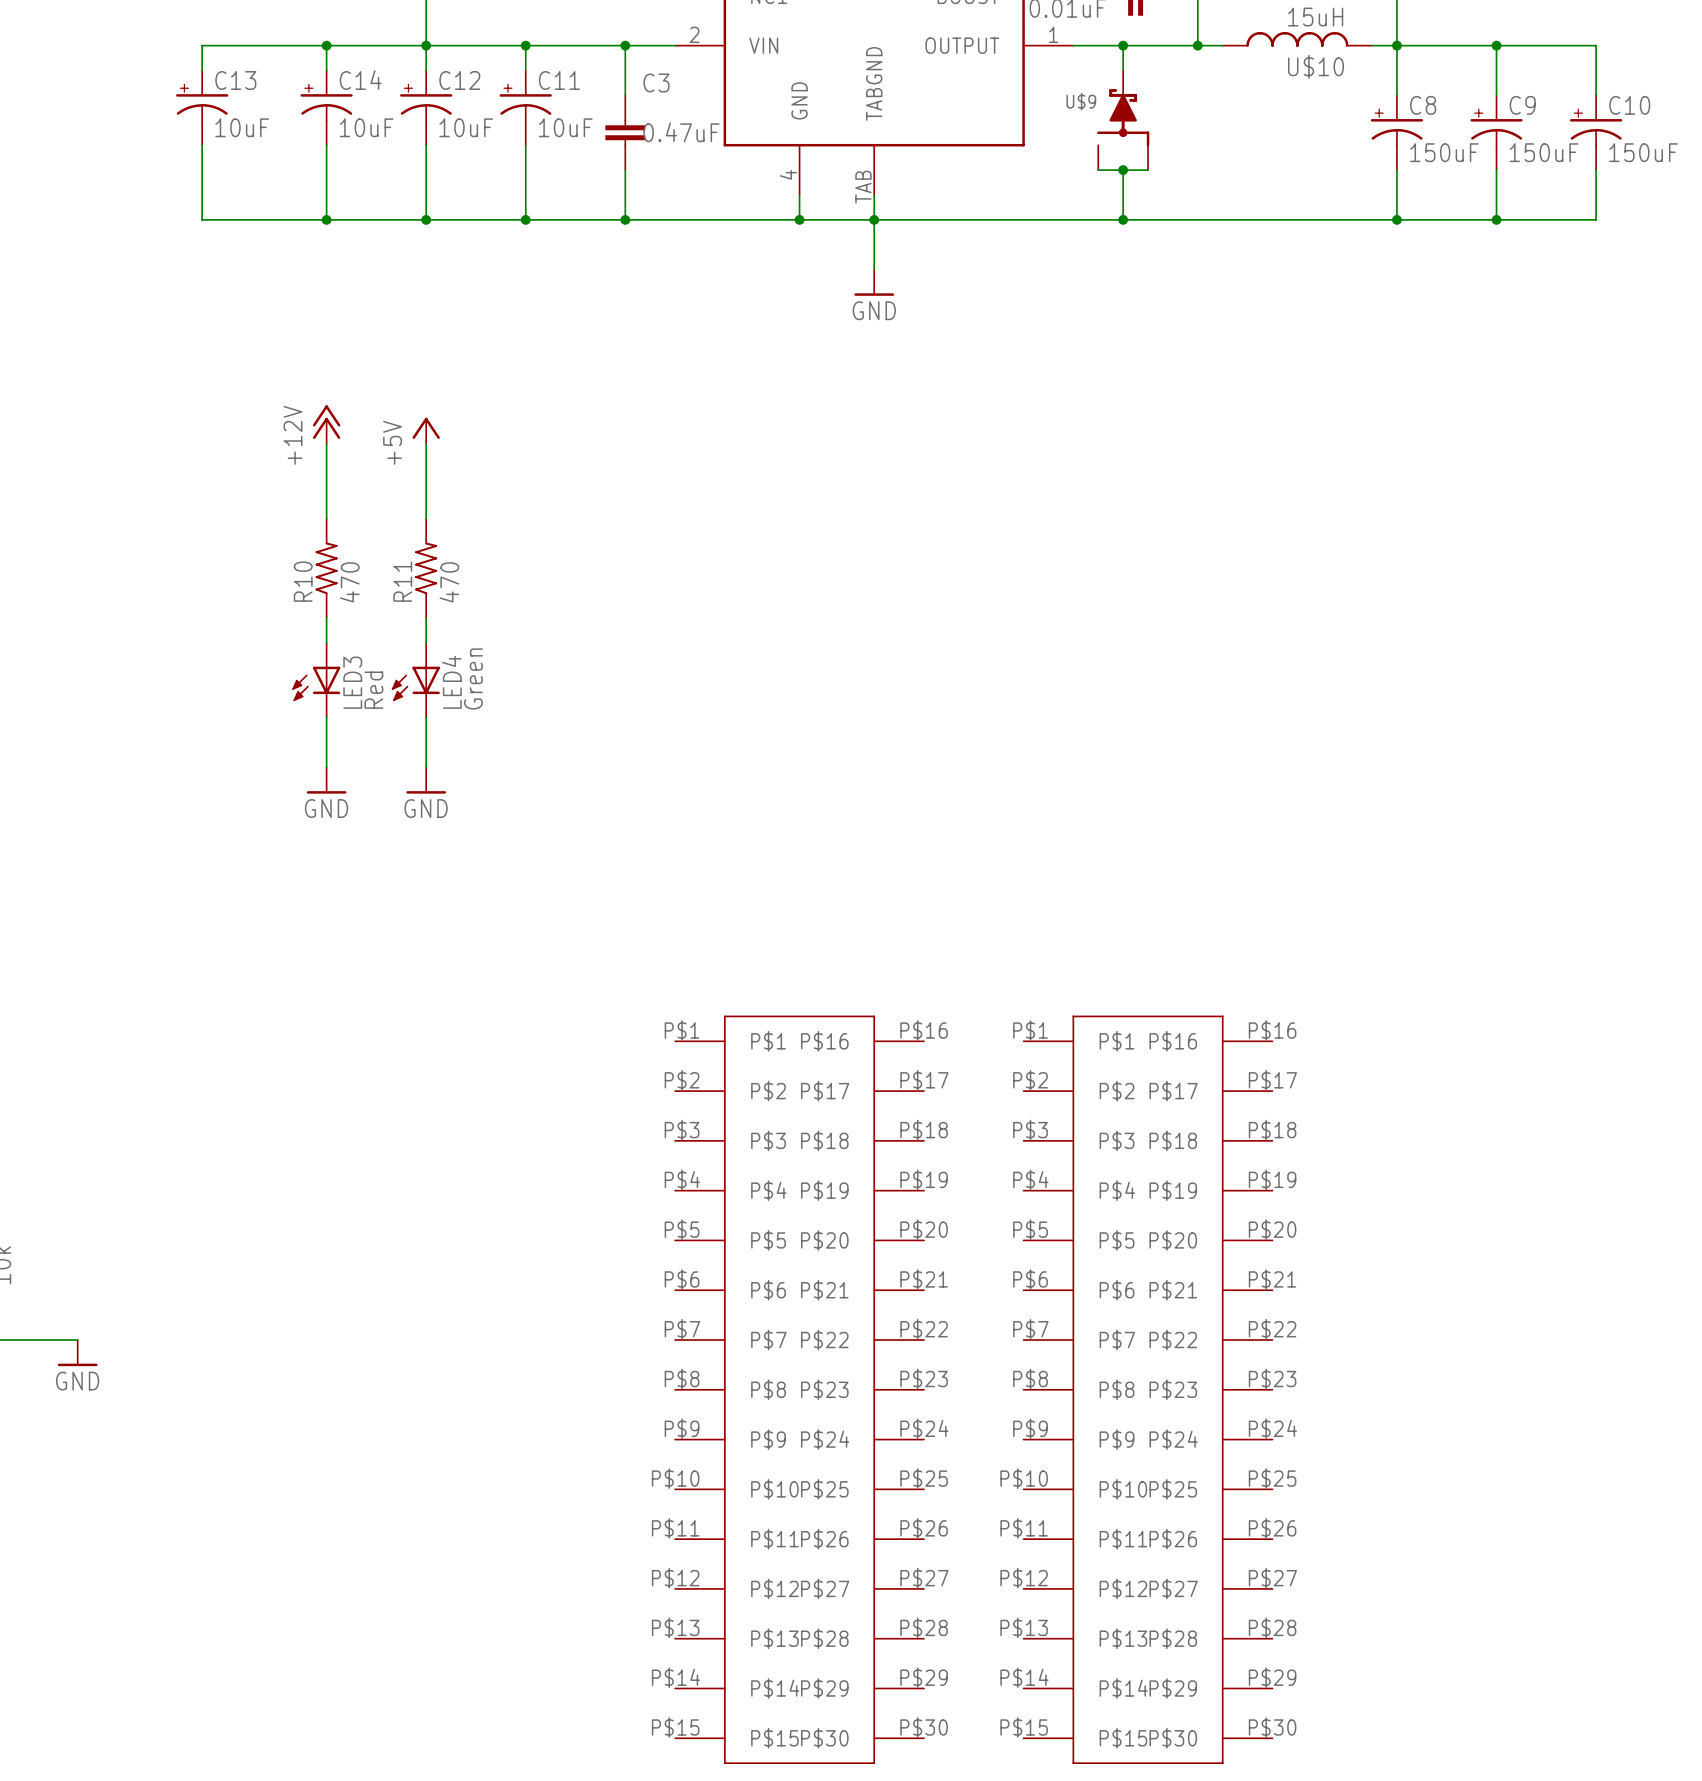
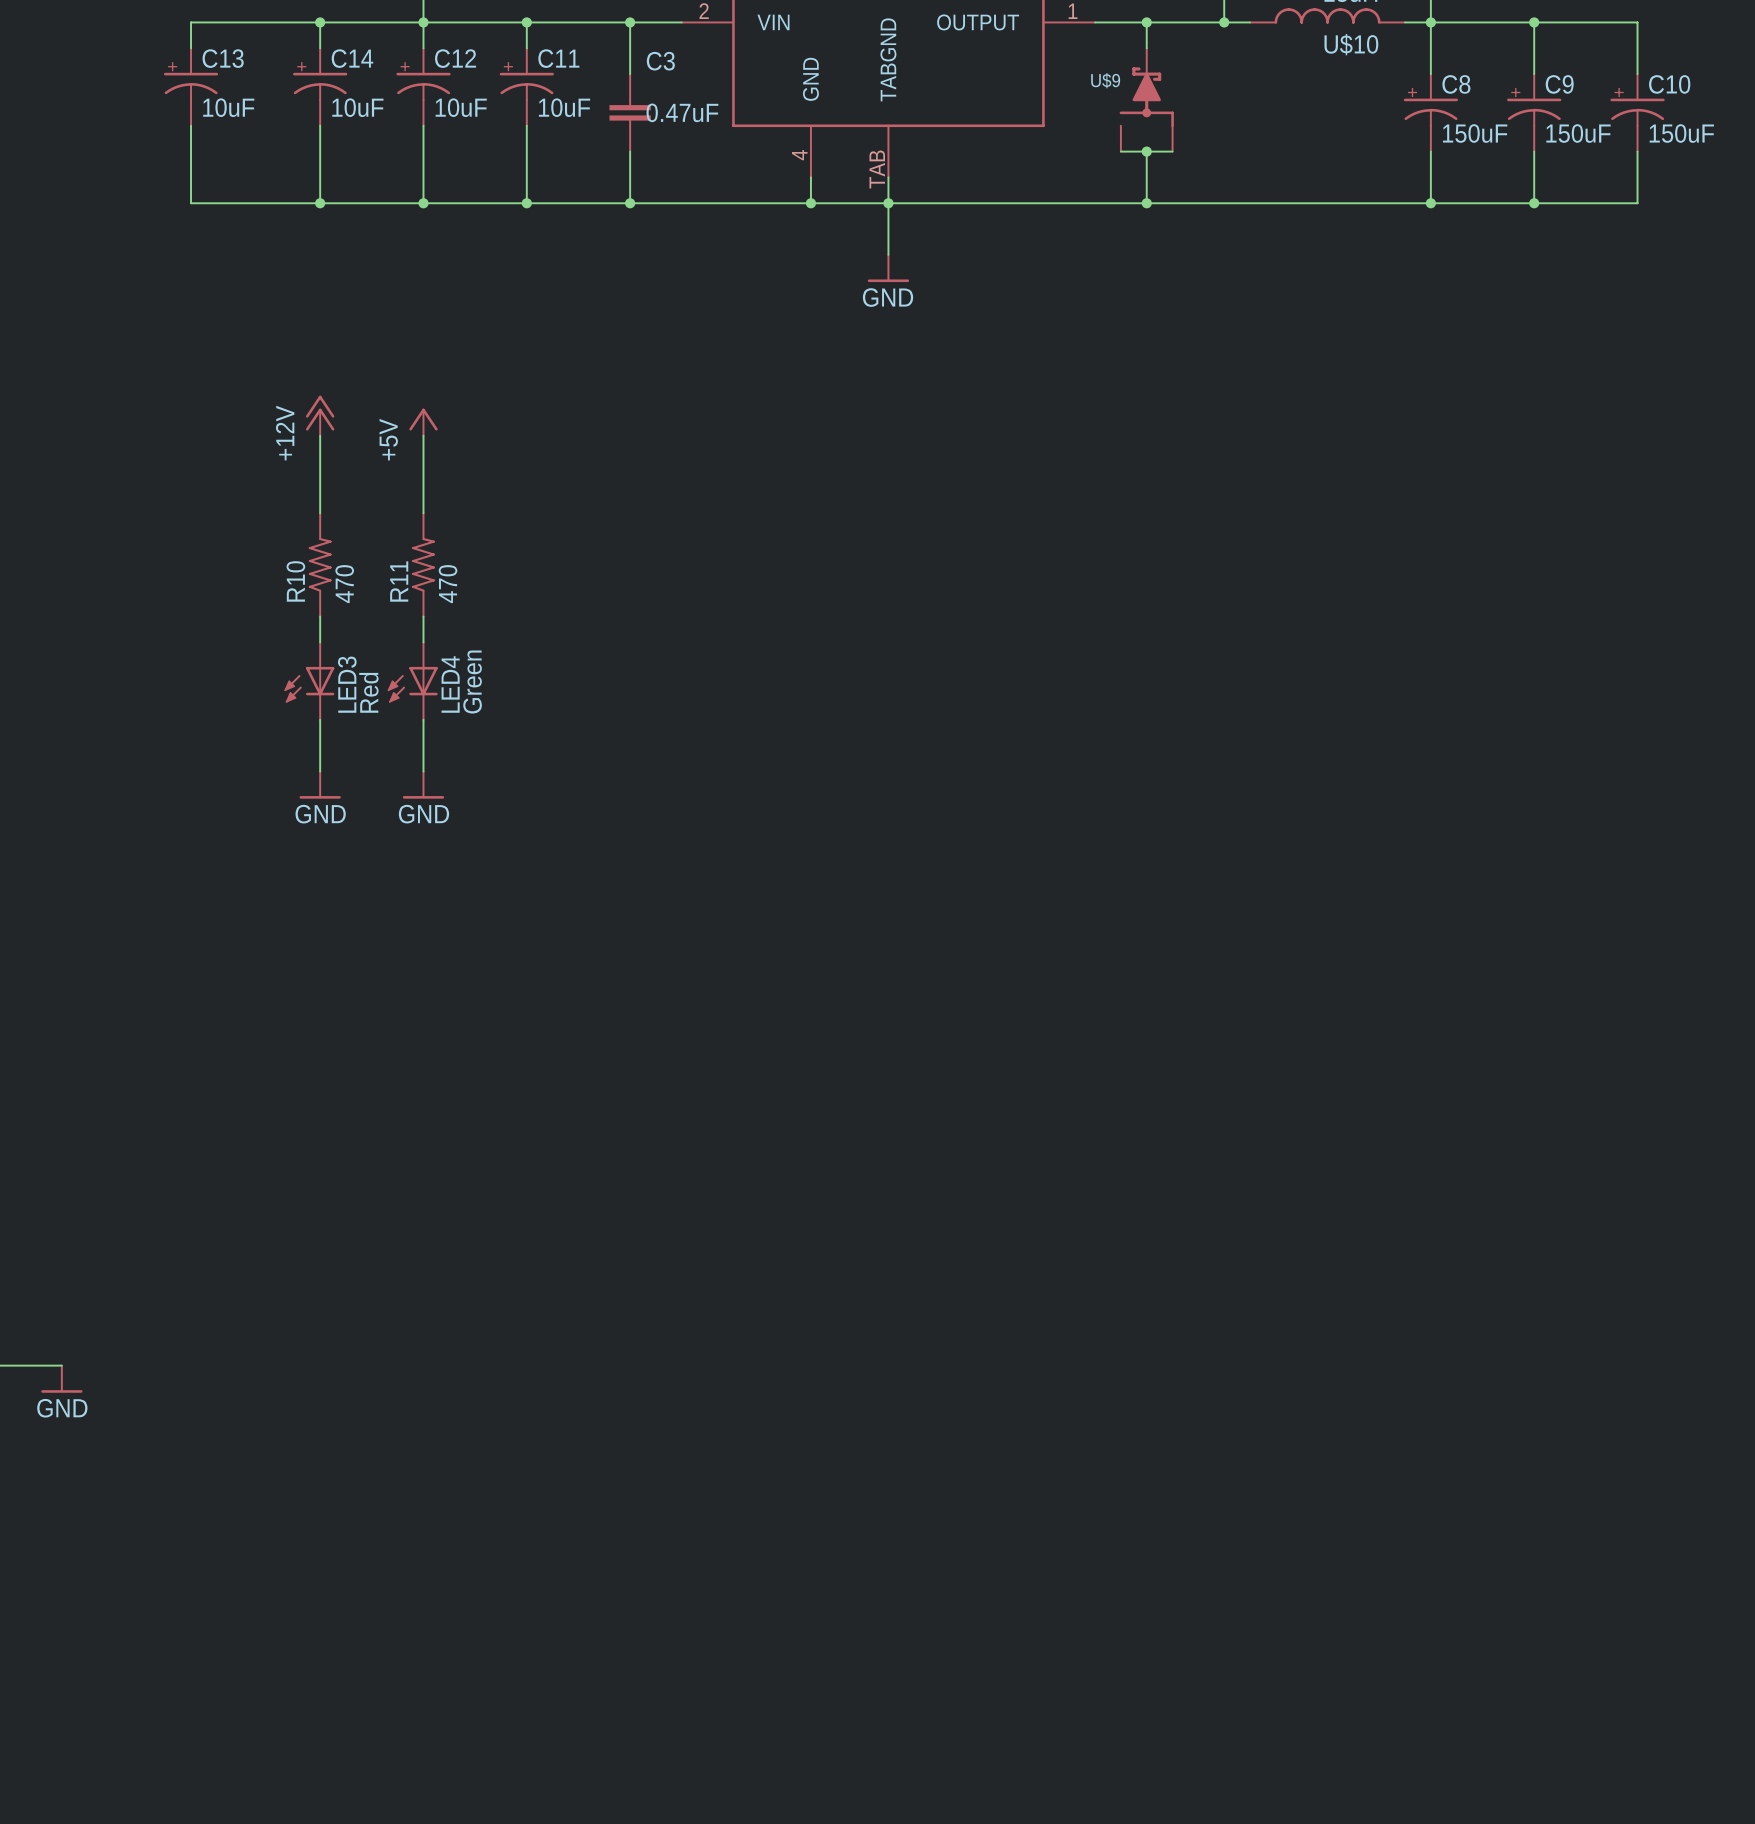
part: (799, 1389) -> none
part: (1148, 1389) -> none

